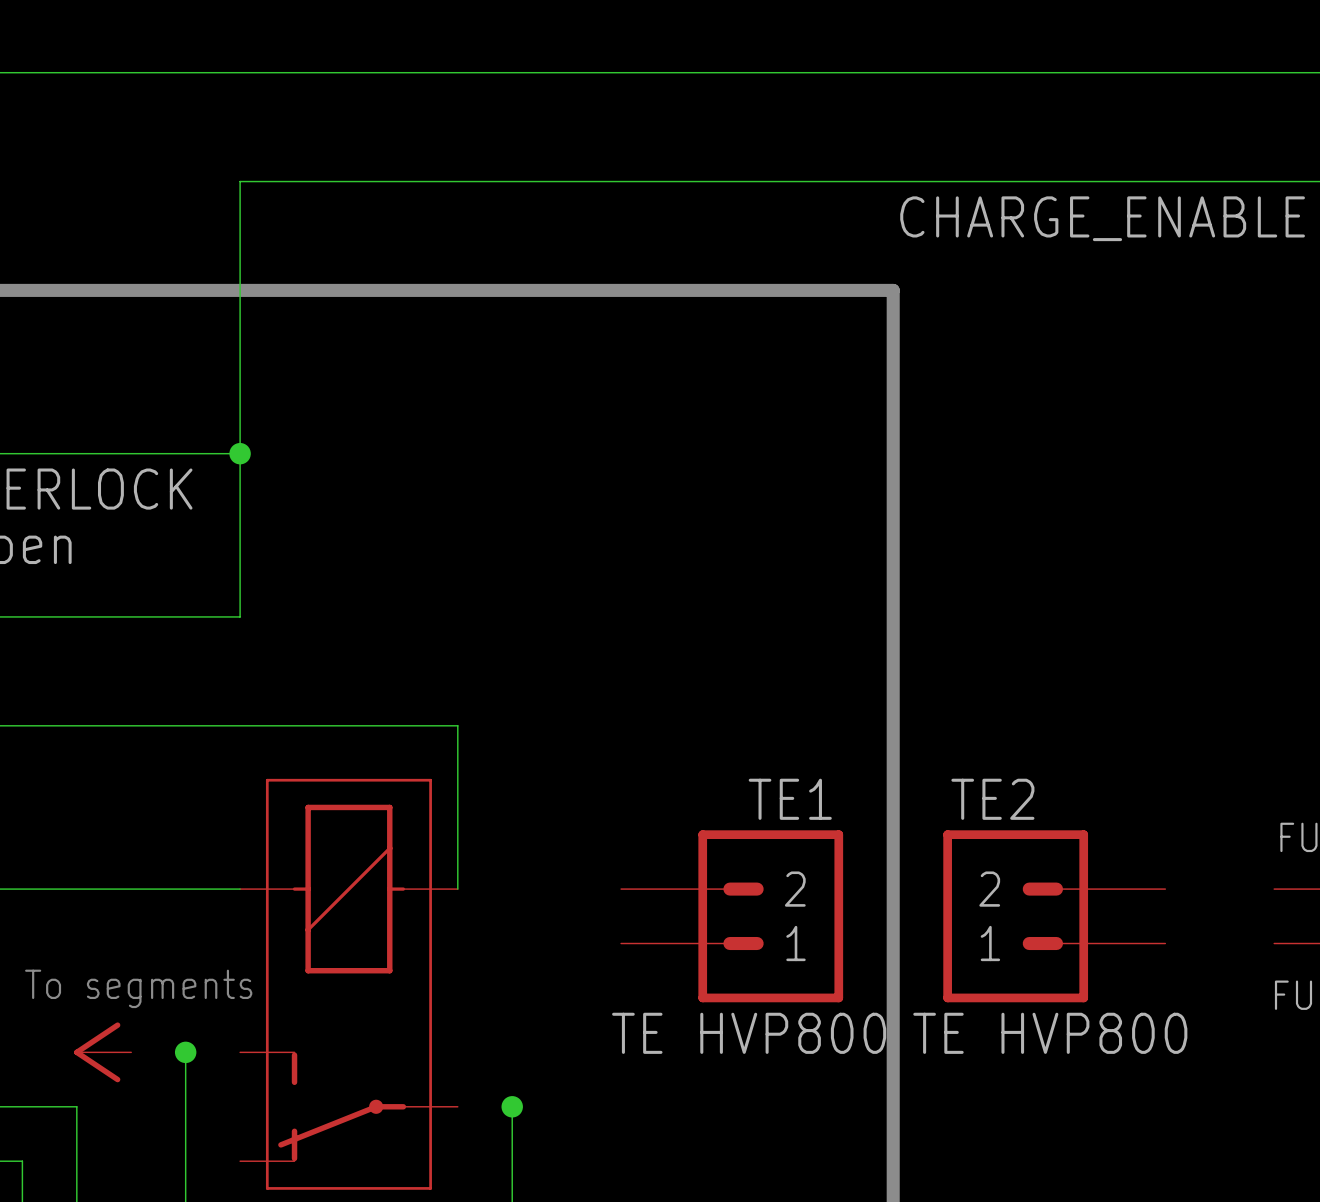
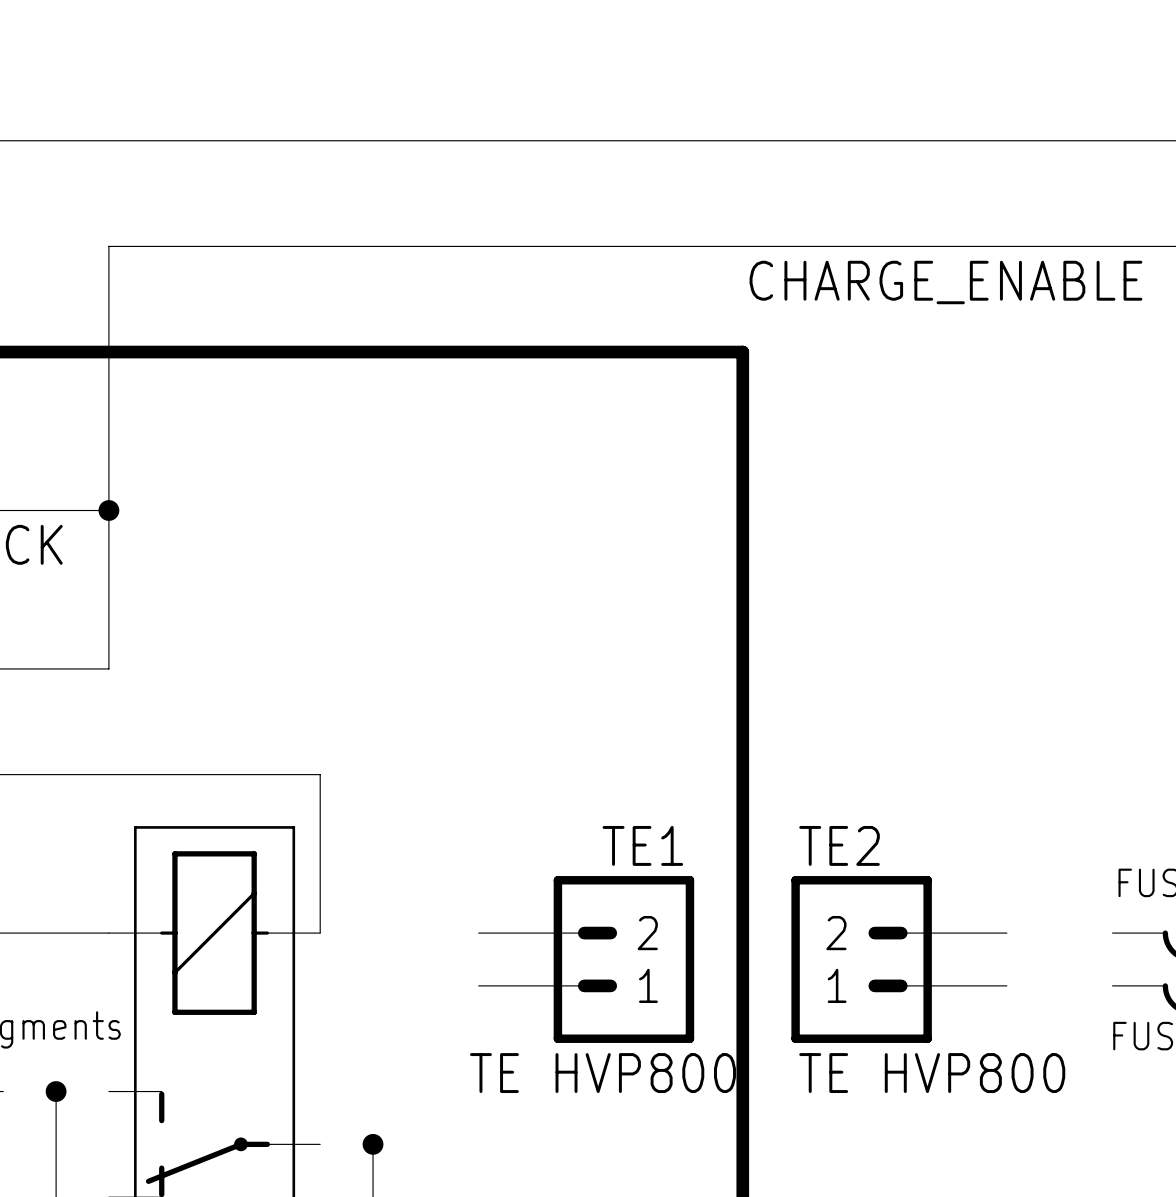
TE2 value position: TE HVP800 (1050, 1033) -> TE HVP800 (932, 1073)

